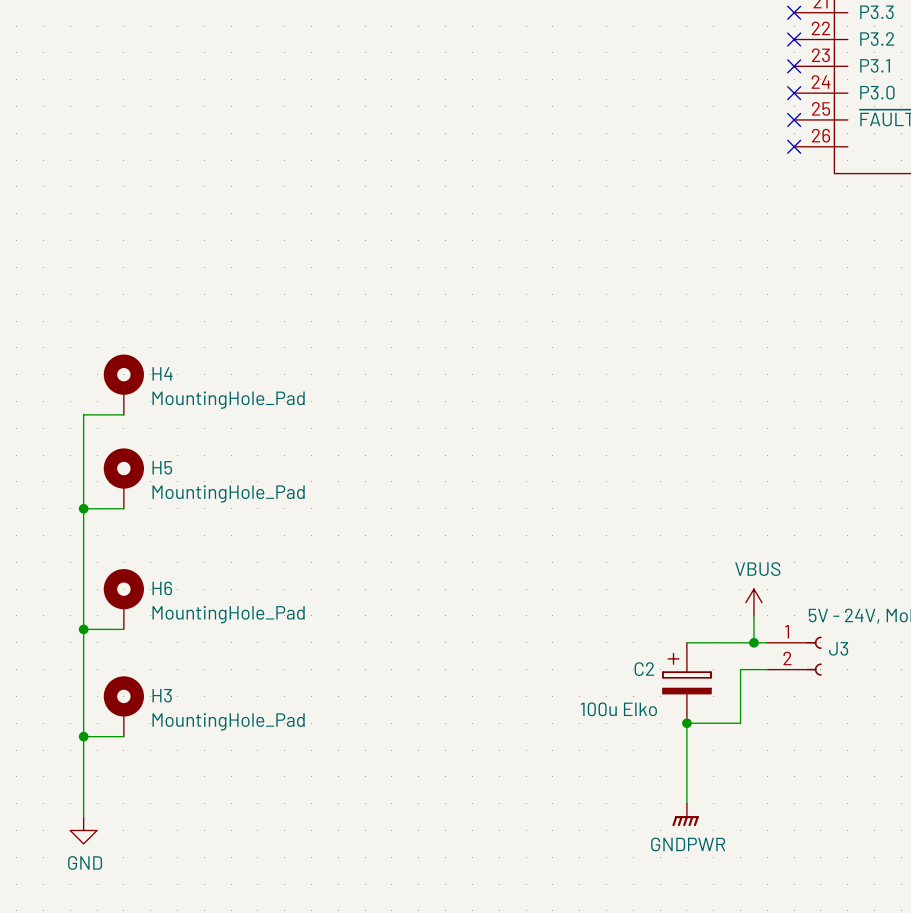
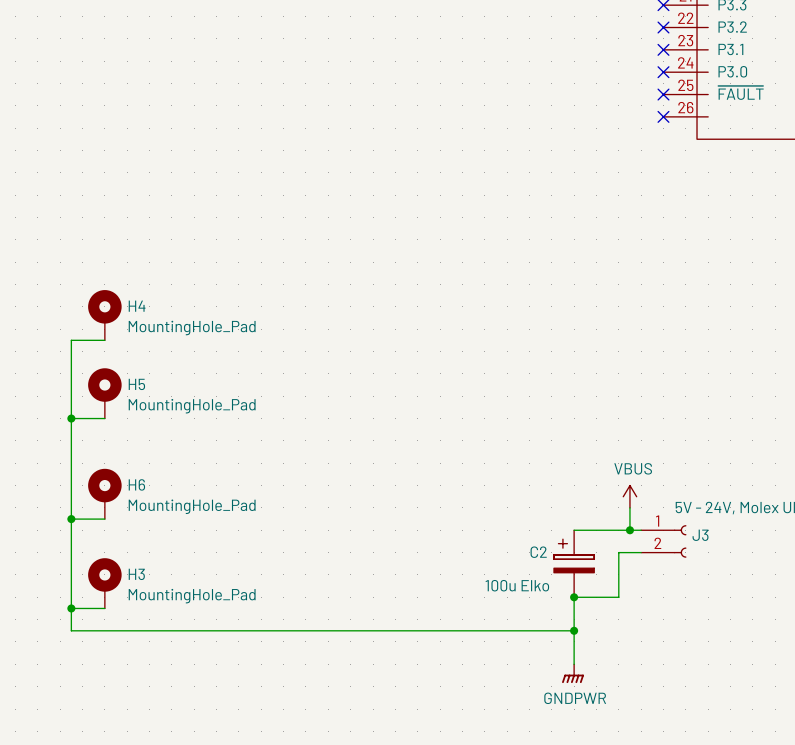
wire: (83, 763) (83, 817) -> (71, 630) (574, 630)
junction: none -> (574, 630)
power symbol: GND (83, 830) -> none

